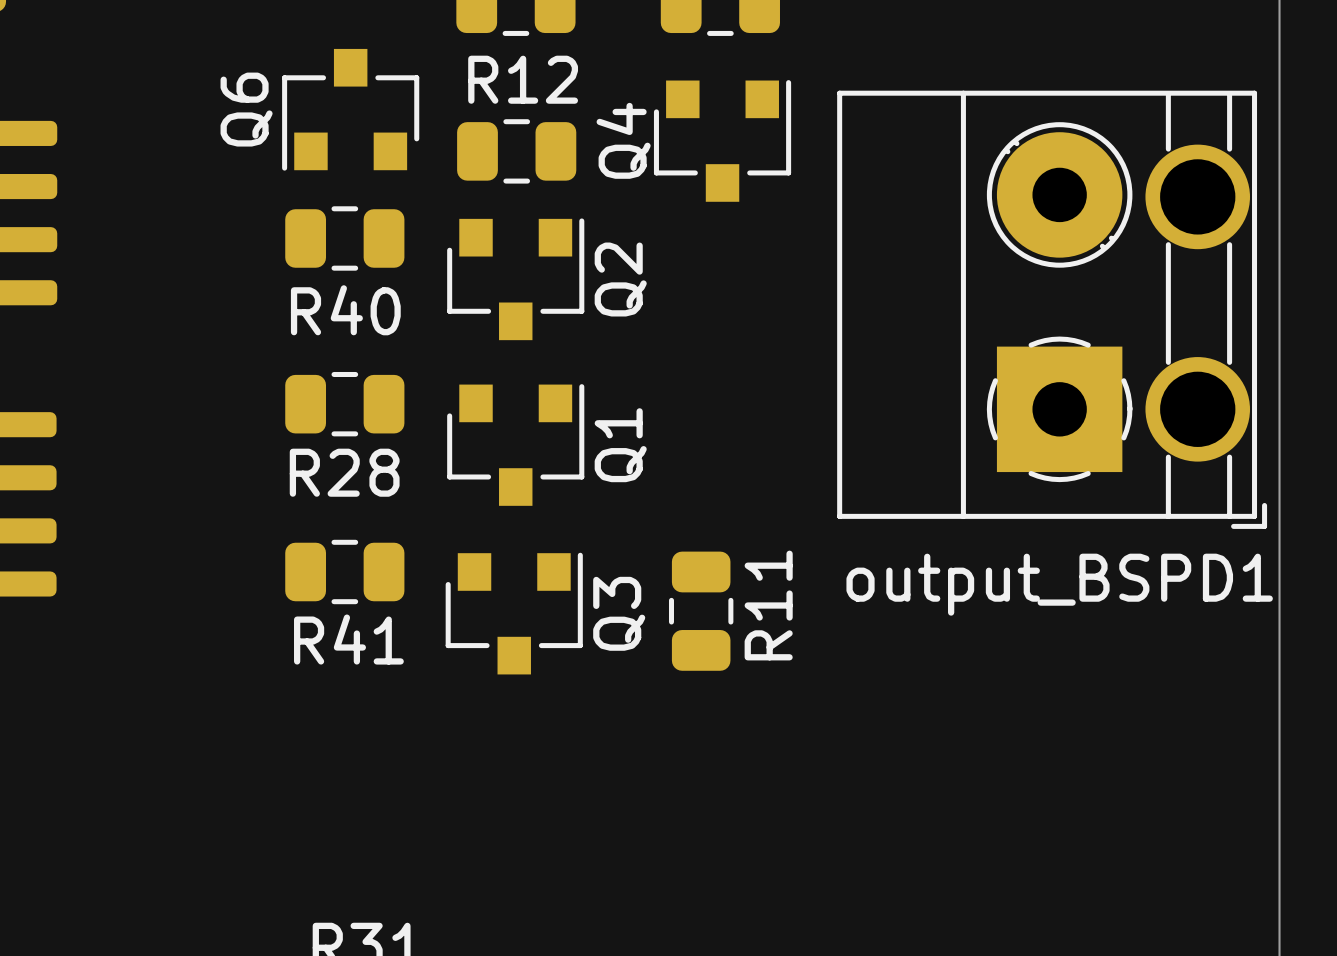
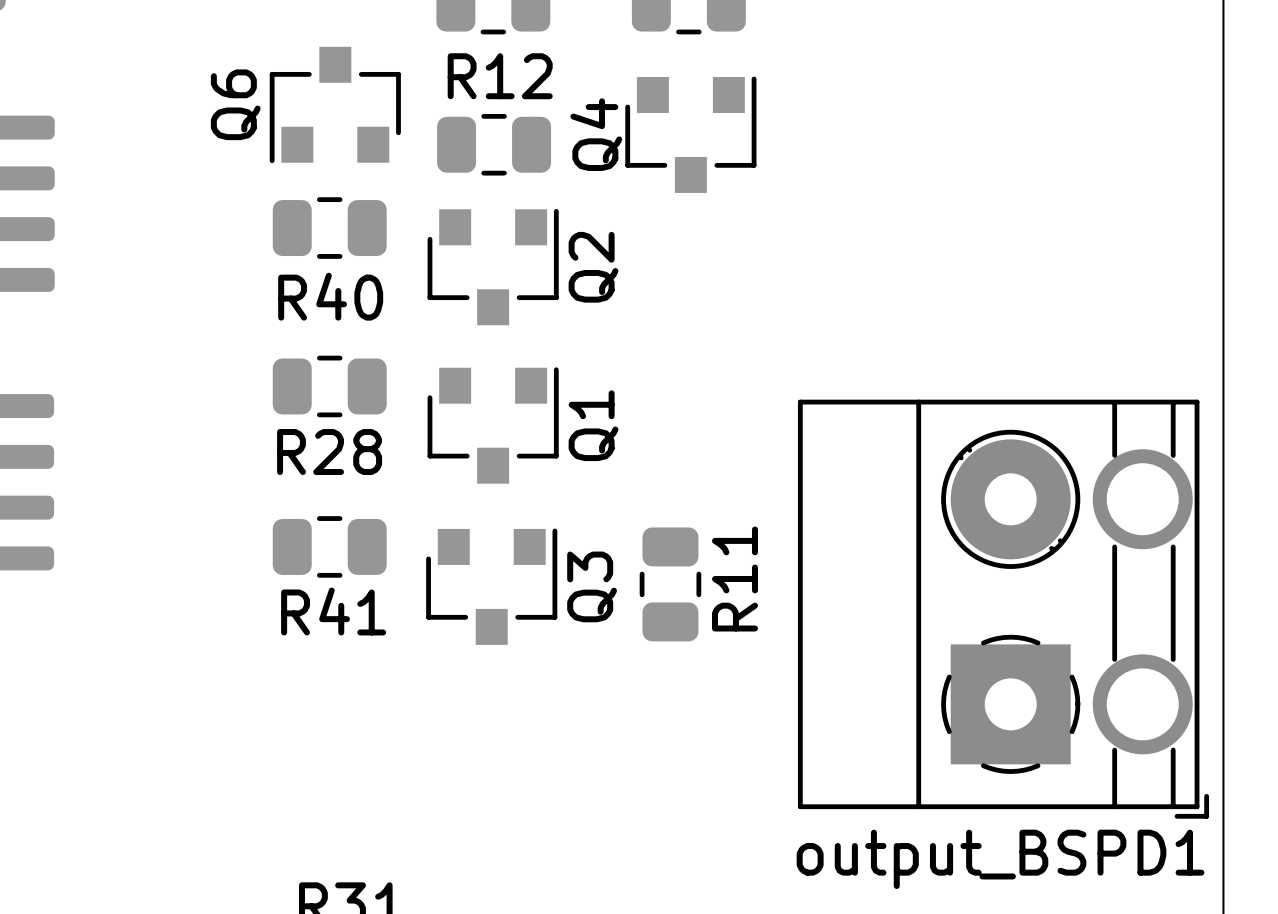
output_BSPD1 footprint: [837, 90, 1268, 529] -> [797, 399, 1210, 819]

